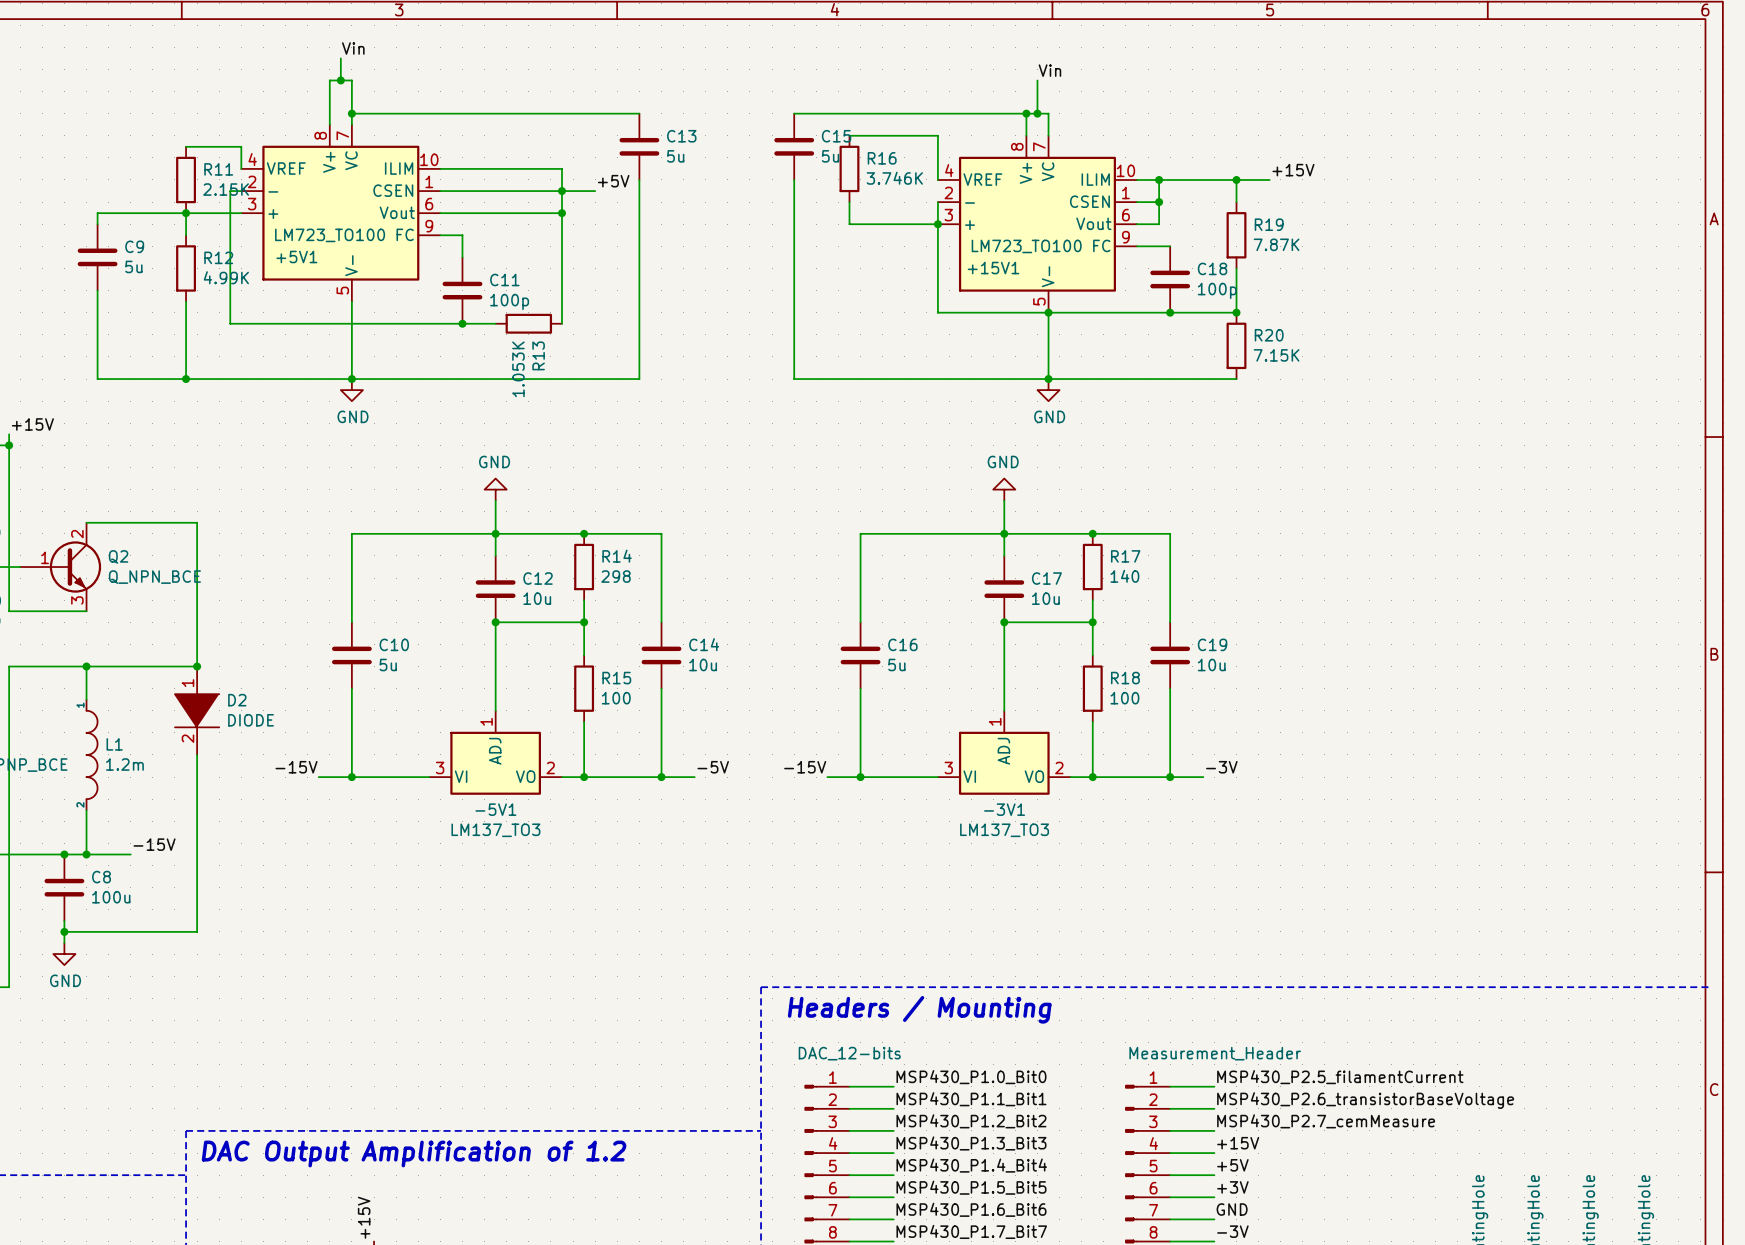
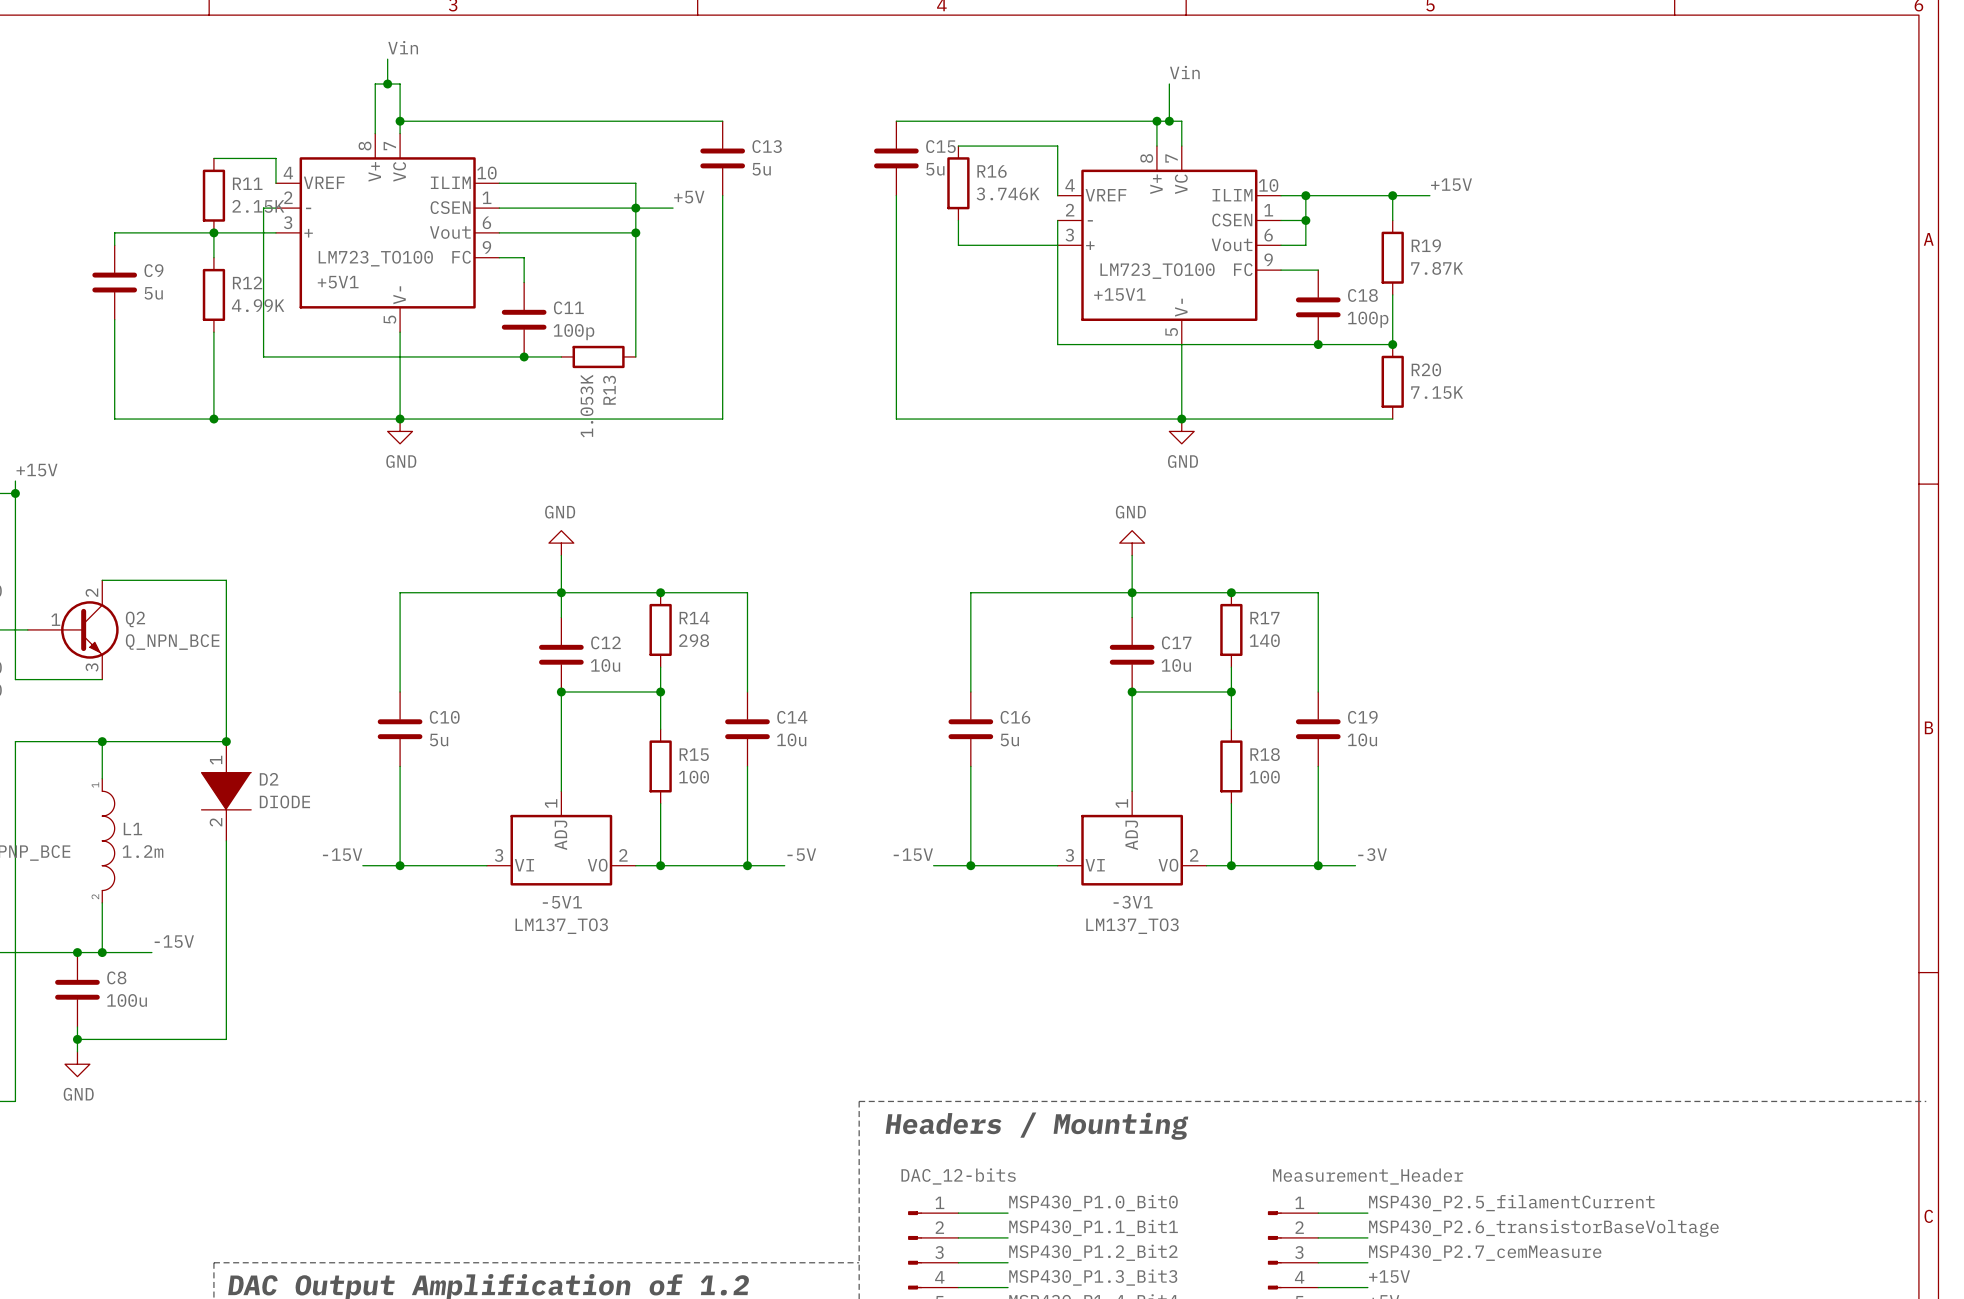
junction: (937, 224) -> none
junction: (1048, 312) -> none

